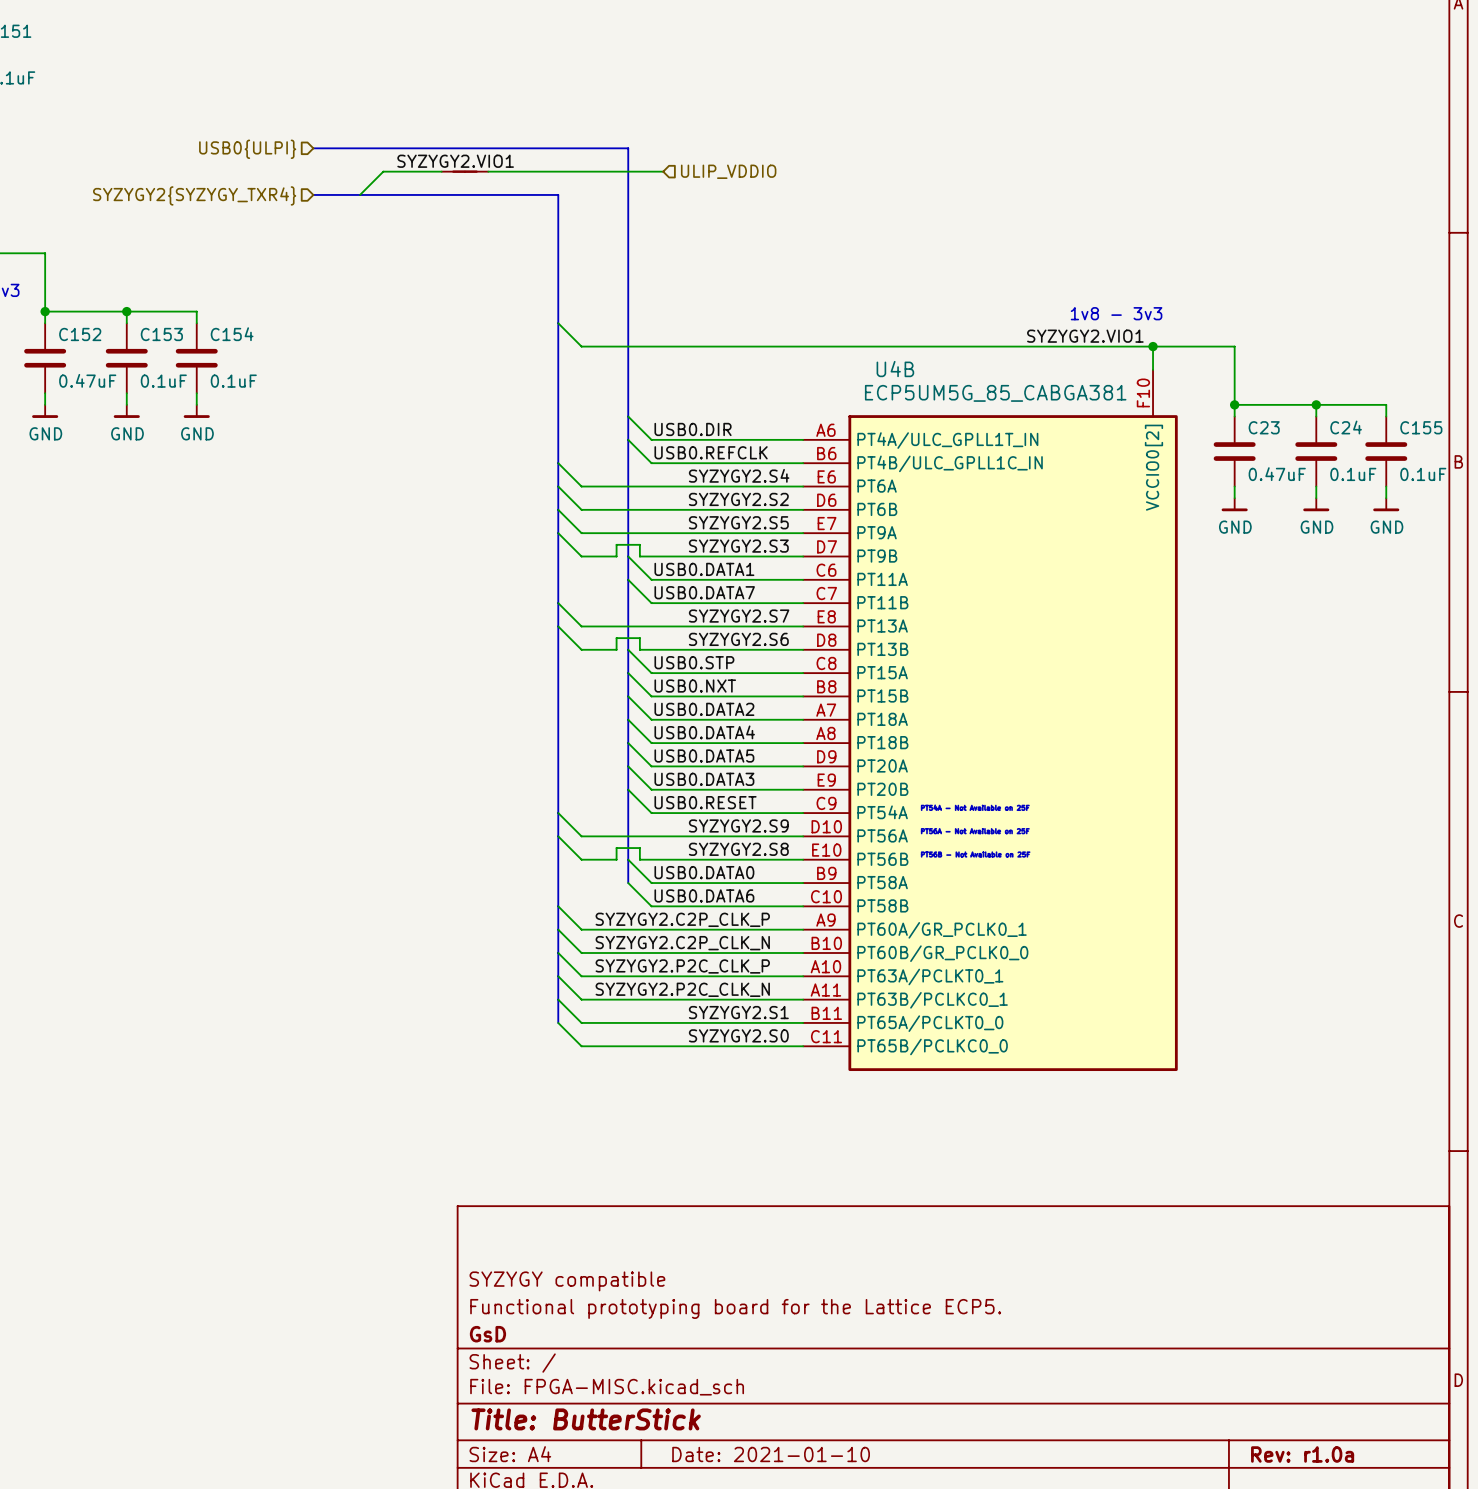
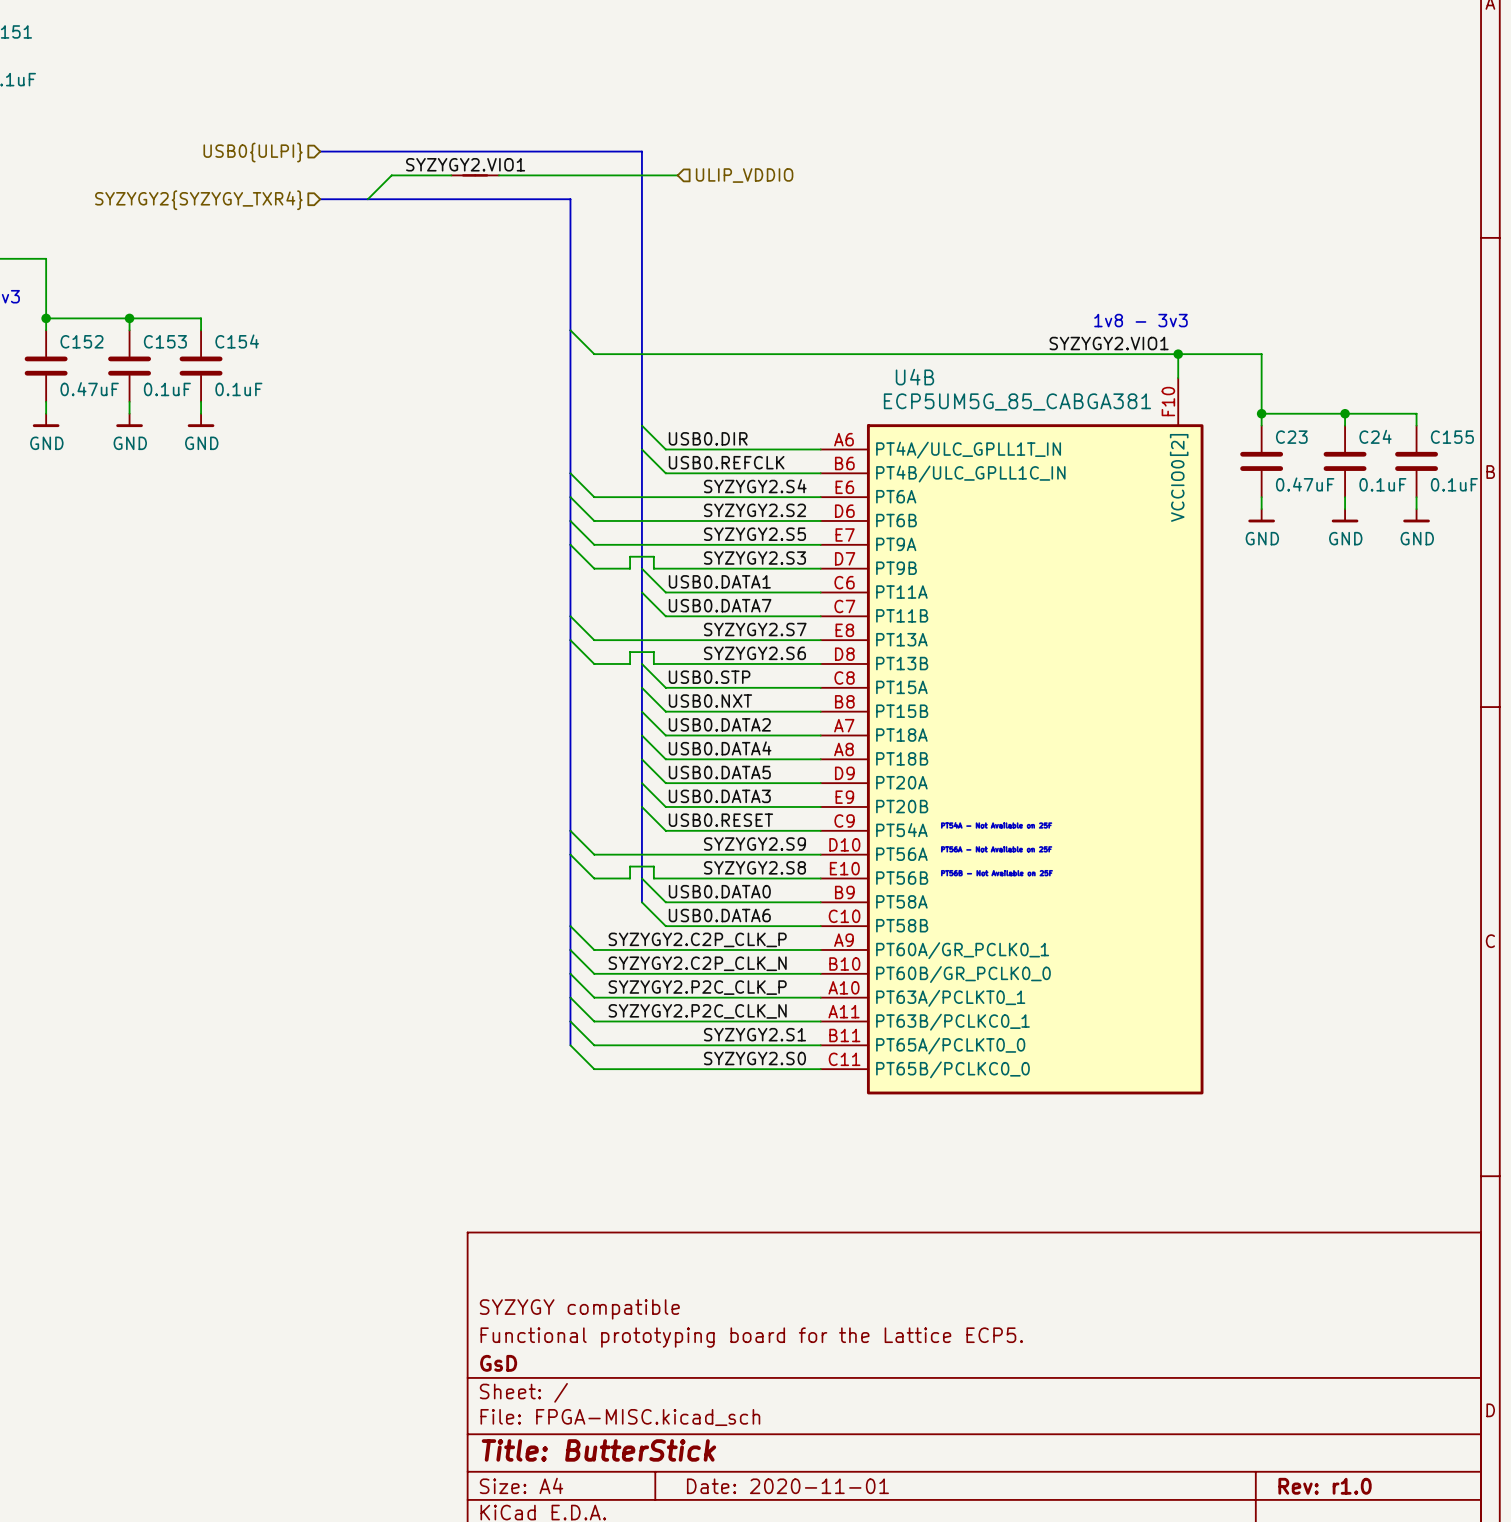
title block: Date: 2021-01-10 (771, 1454) -> Date: 2020-11-01 (787, 1486)
title block: Rev: r1.0a (1302, 1454) -> Rev: r1.0 (1325, 1486)

